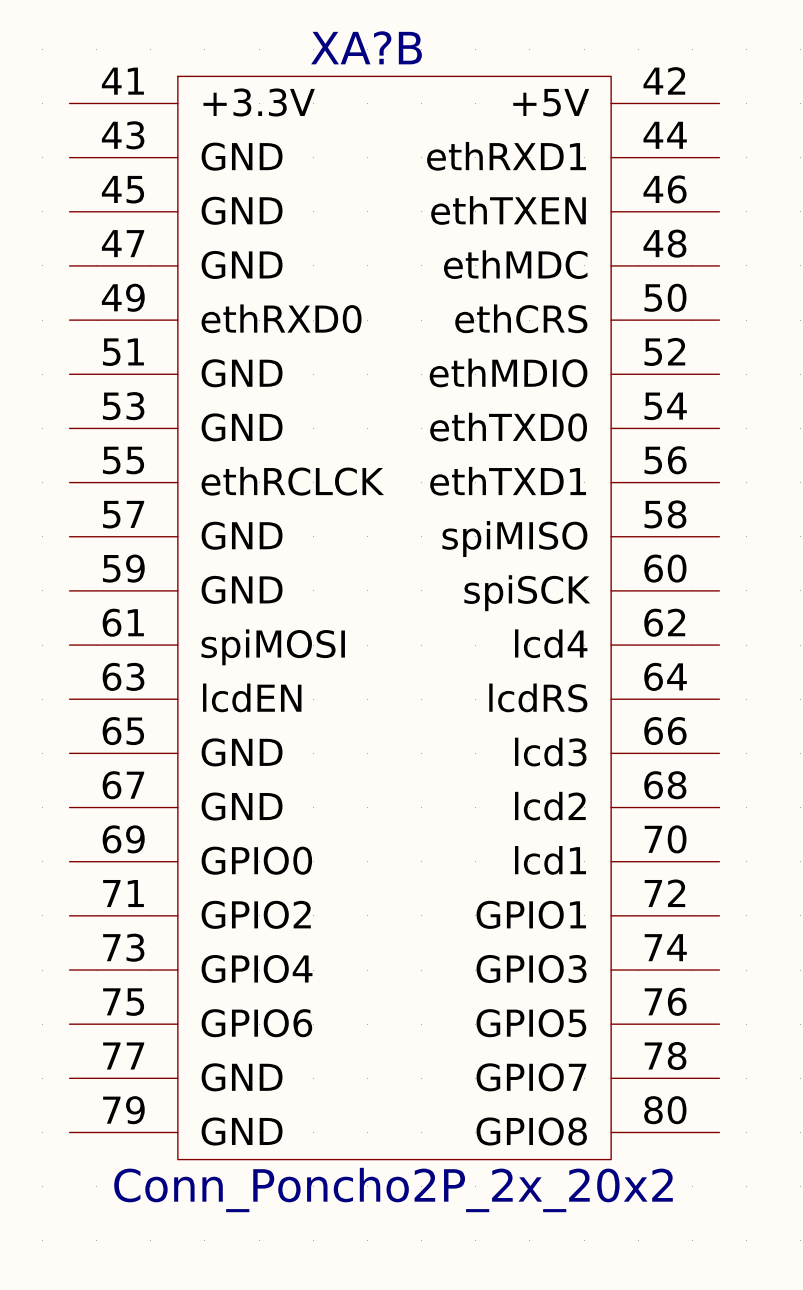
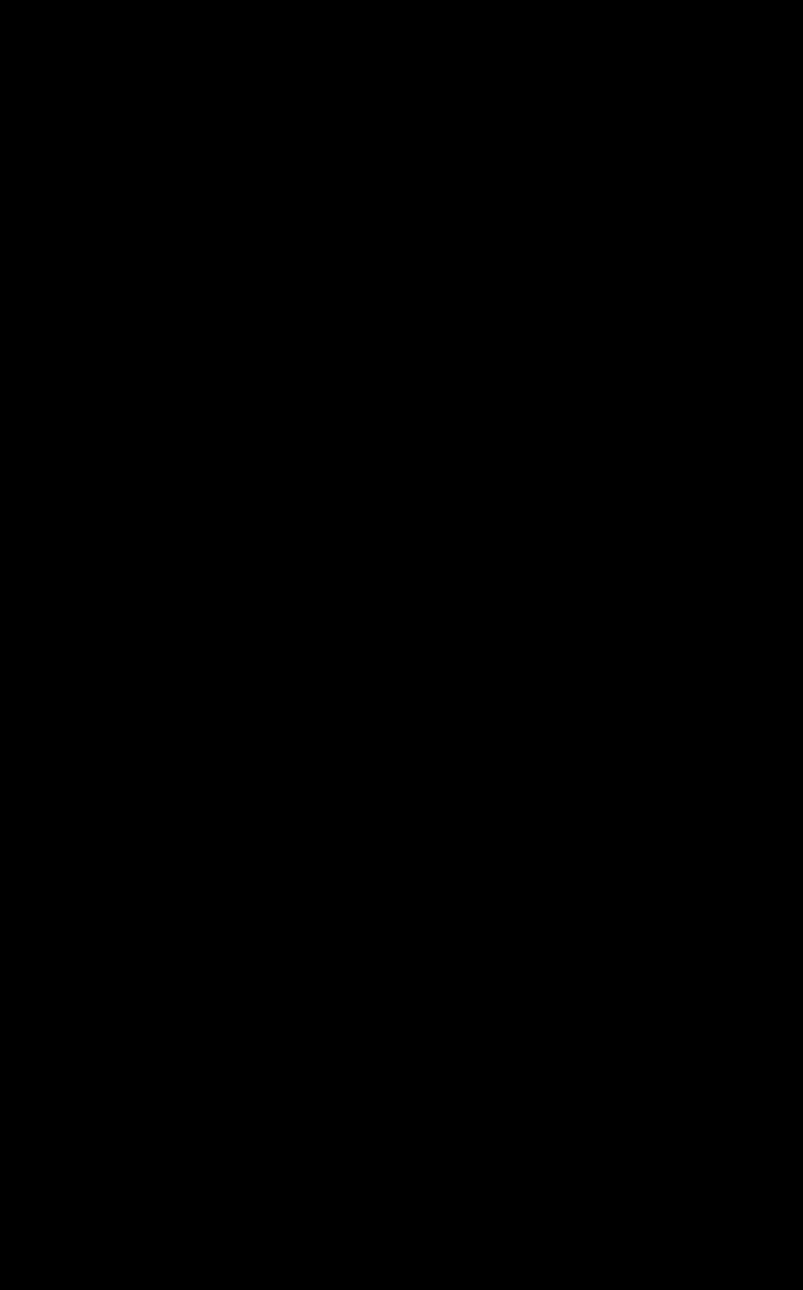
XA?B: Conn_Poncho2P_2x_20x2 (394, 617) -> none

